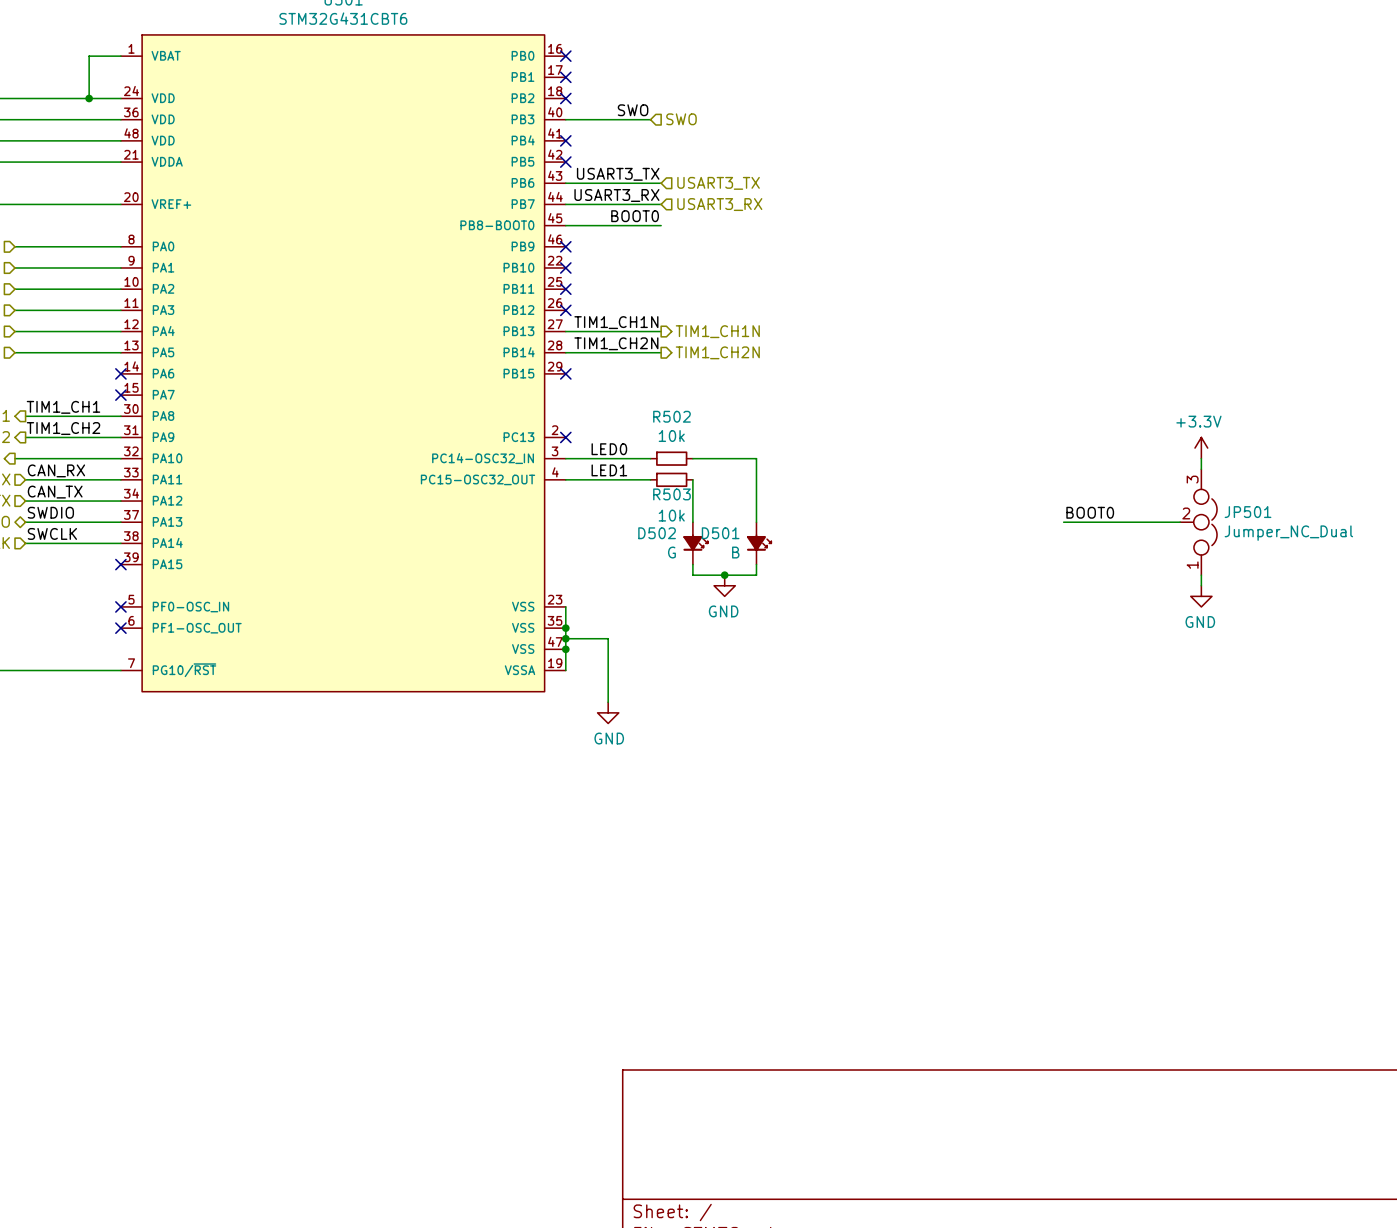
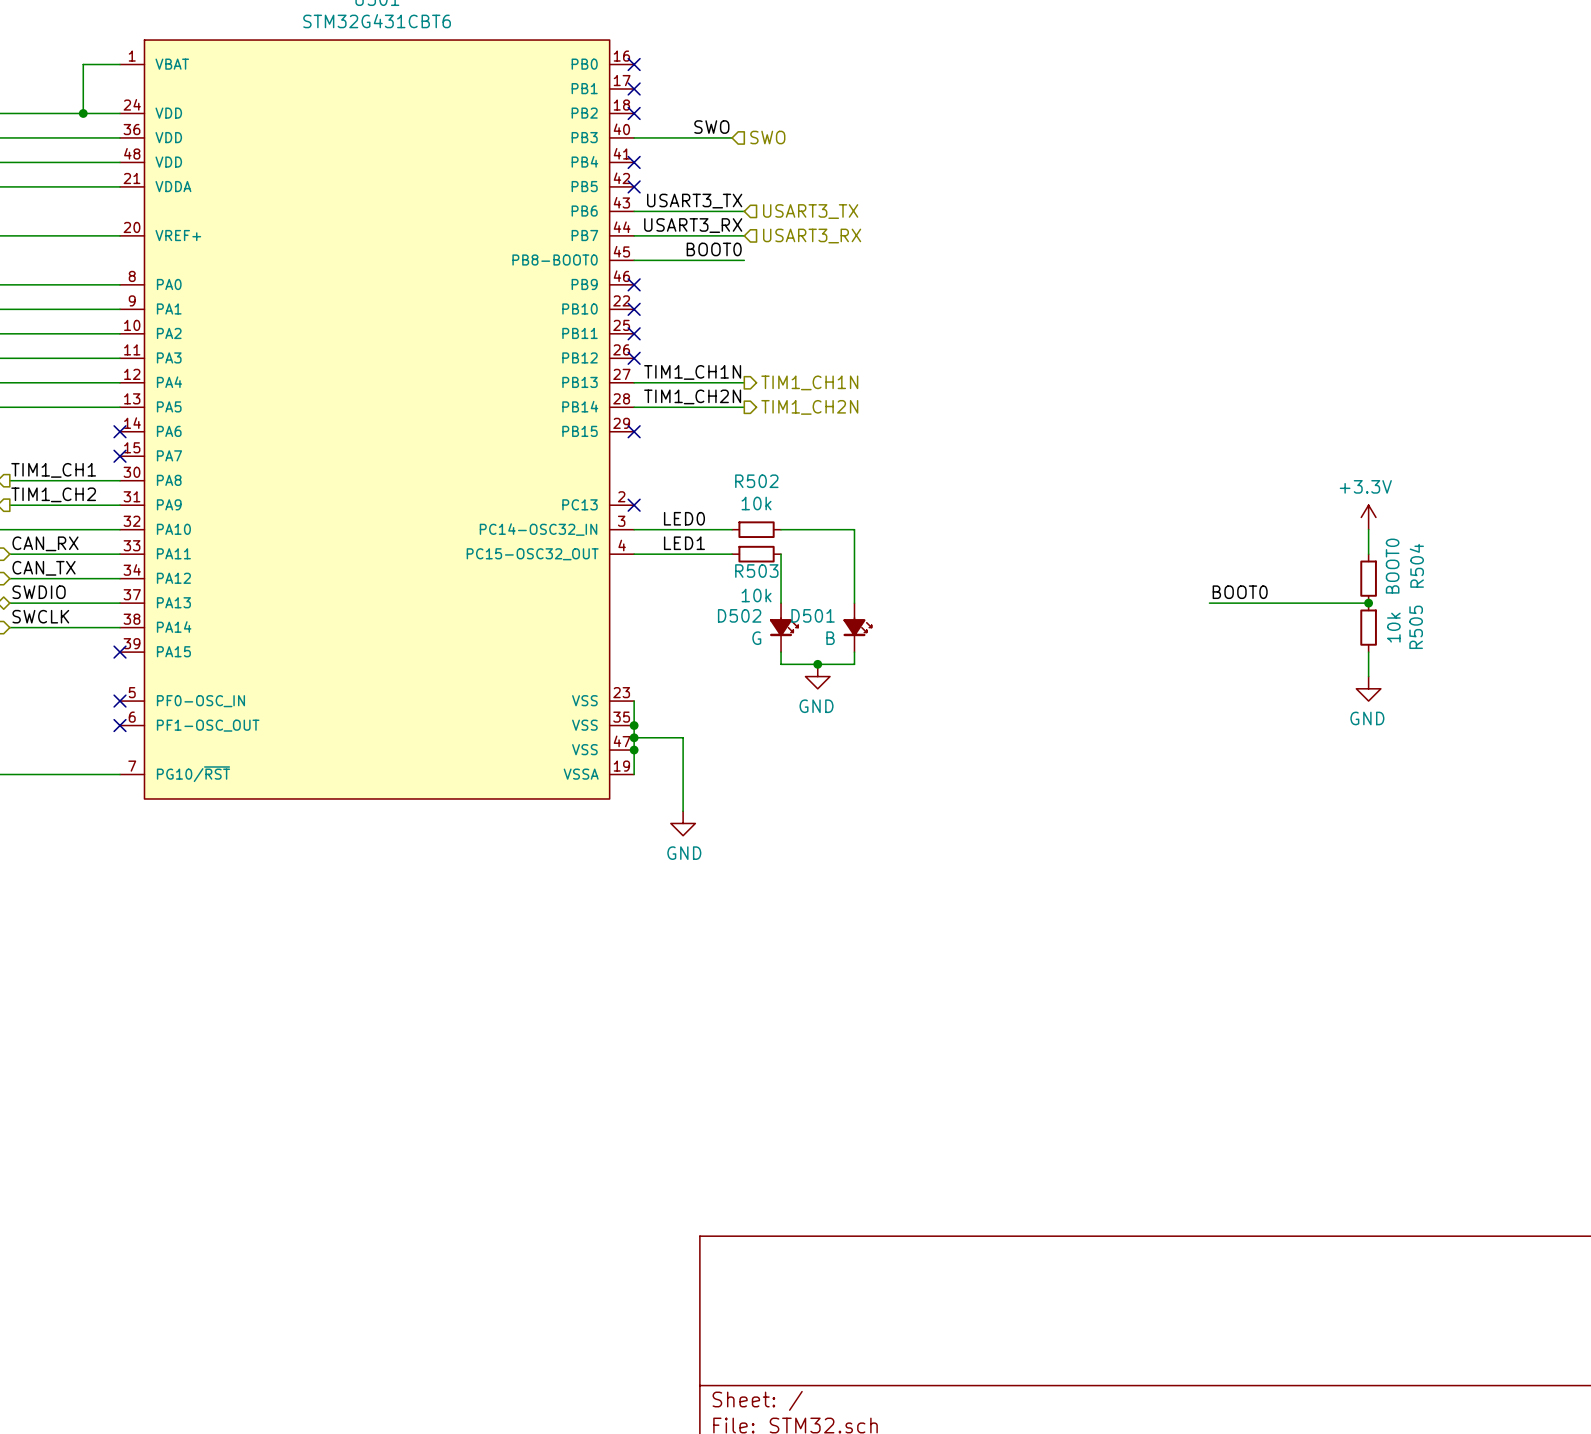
R504: none -> BOOT0 (1368, 578)
JP501: Jumper_NC_Dual (1198, 522) -> none
junction: none -> (1368, 603)
R505: none -> 10k (1368, 627)

